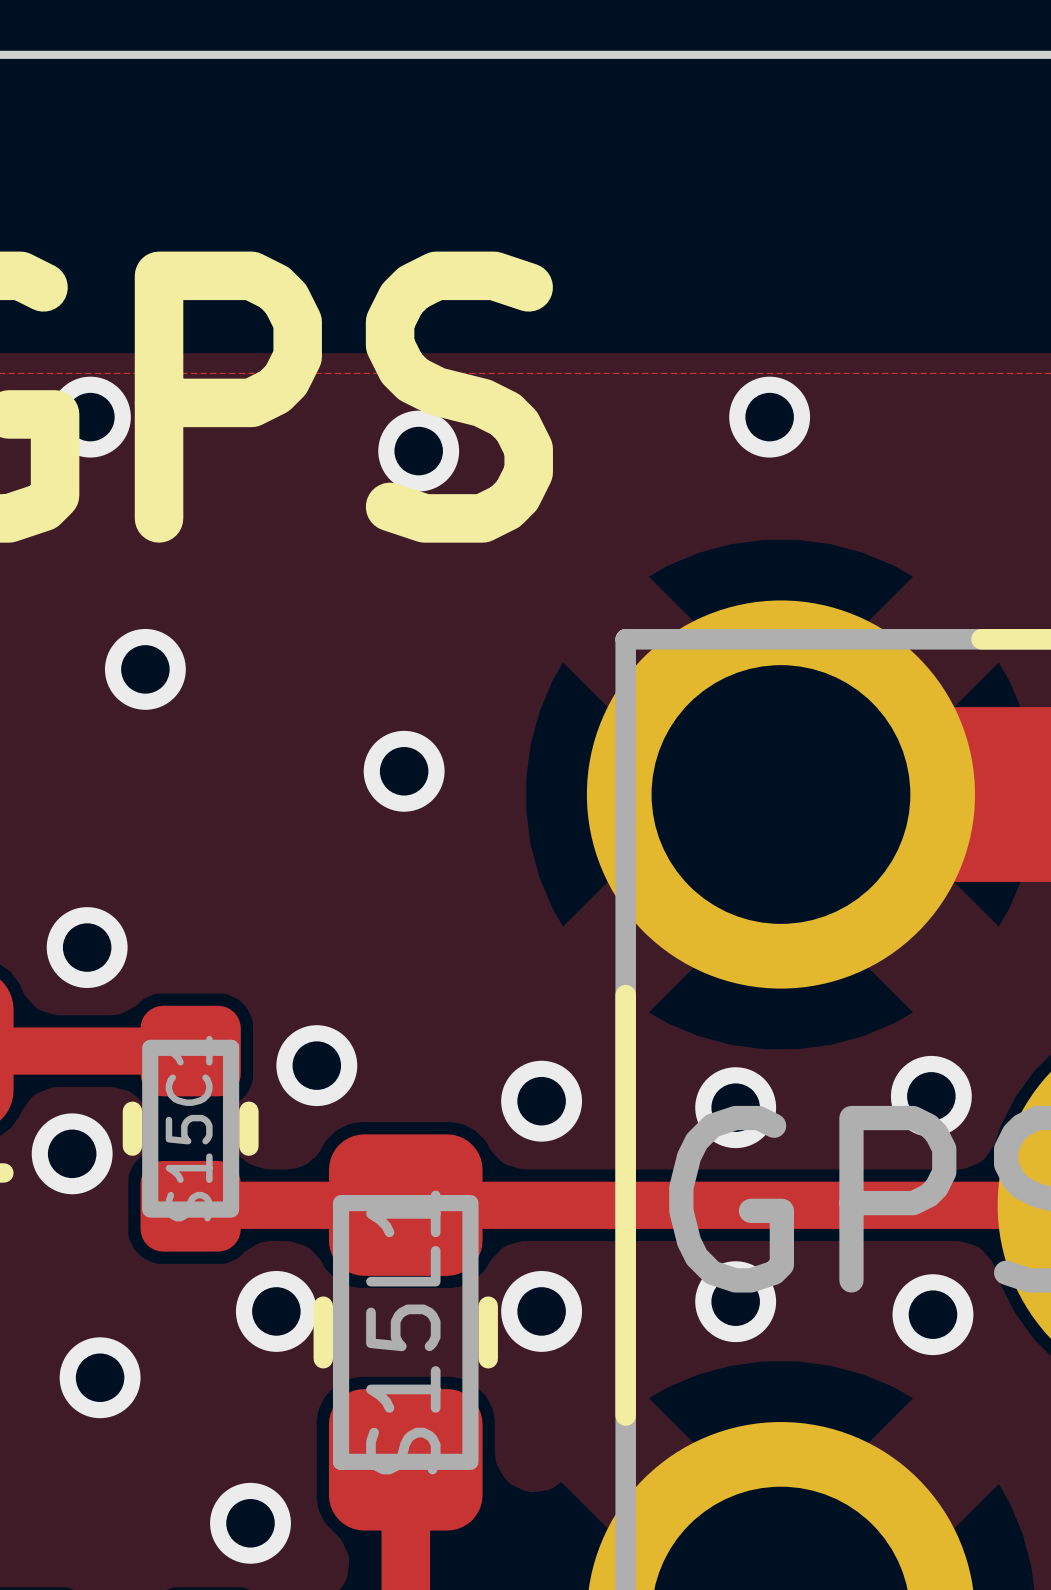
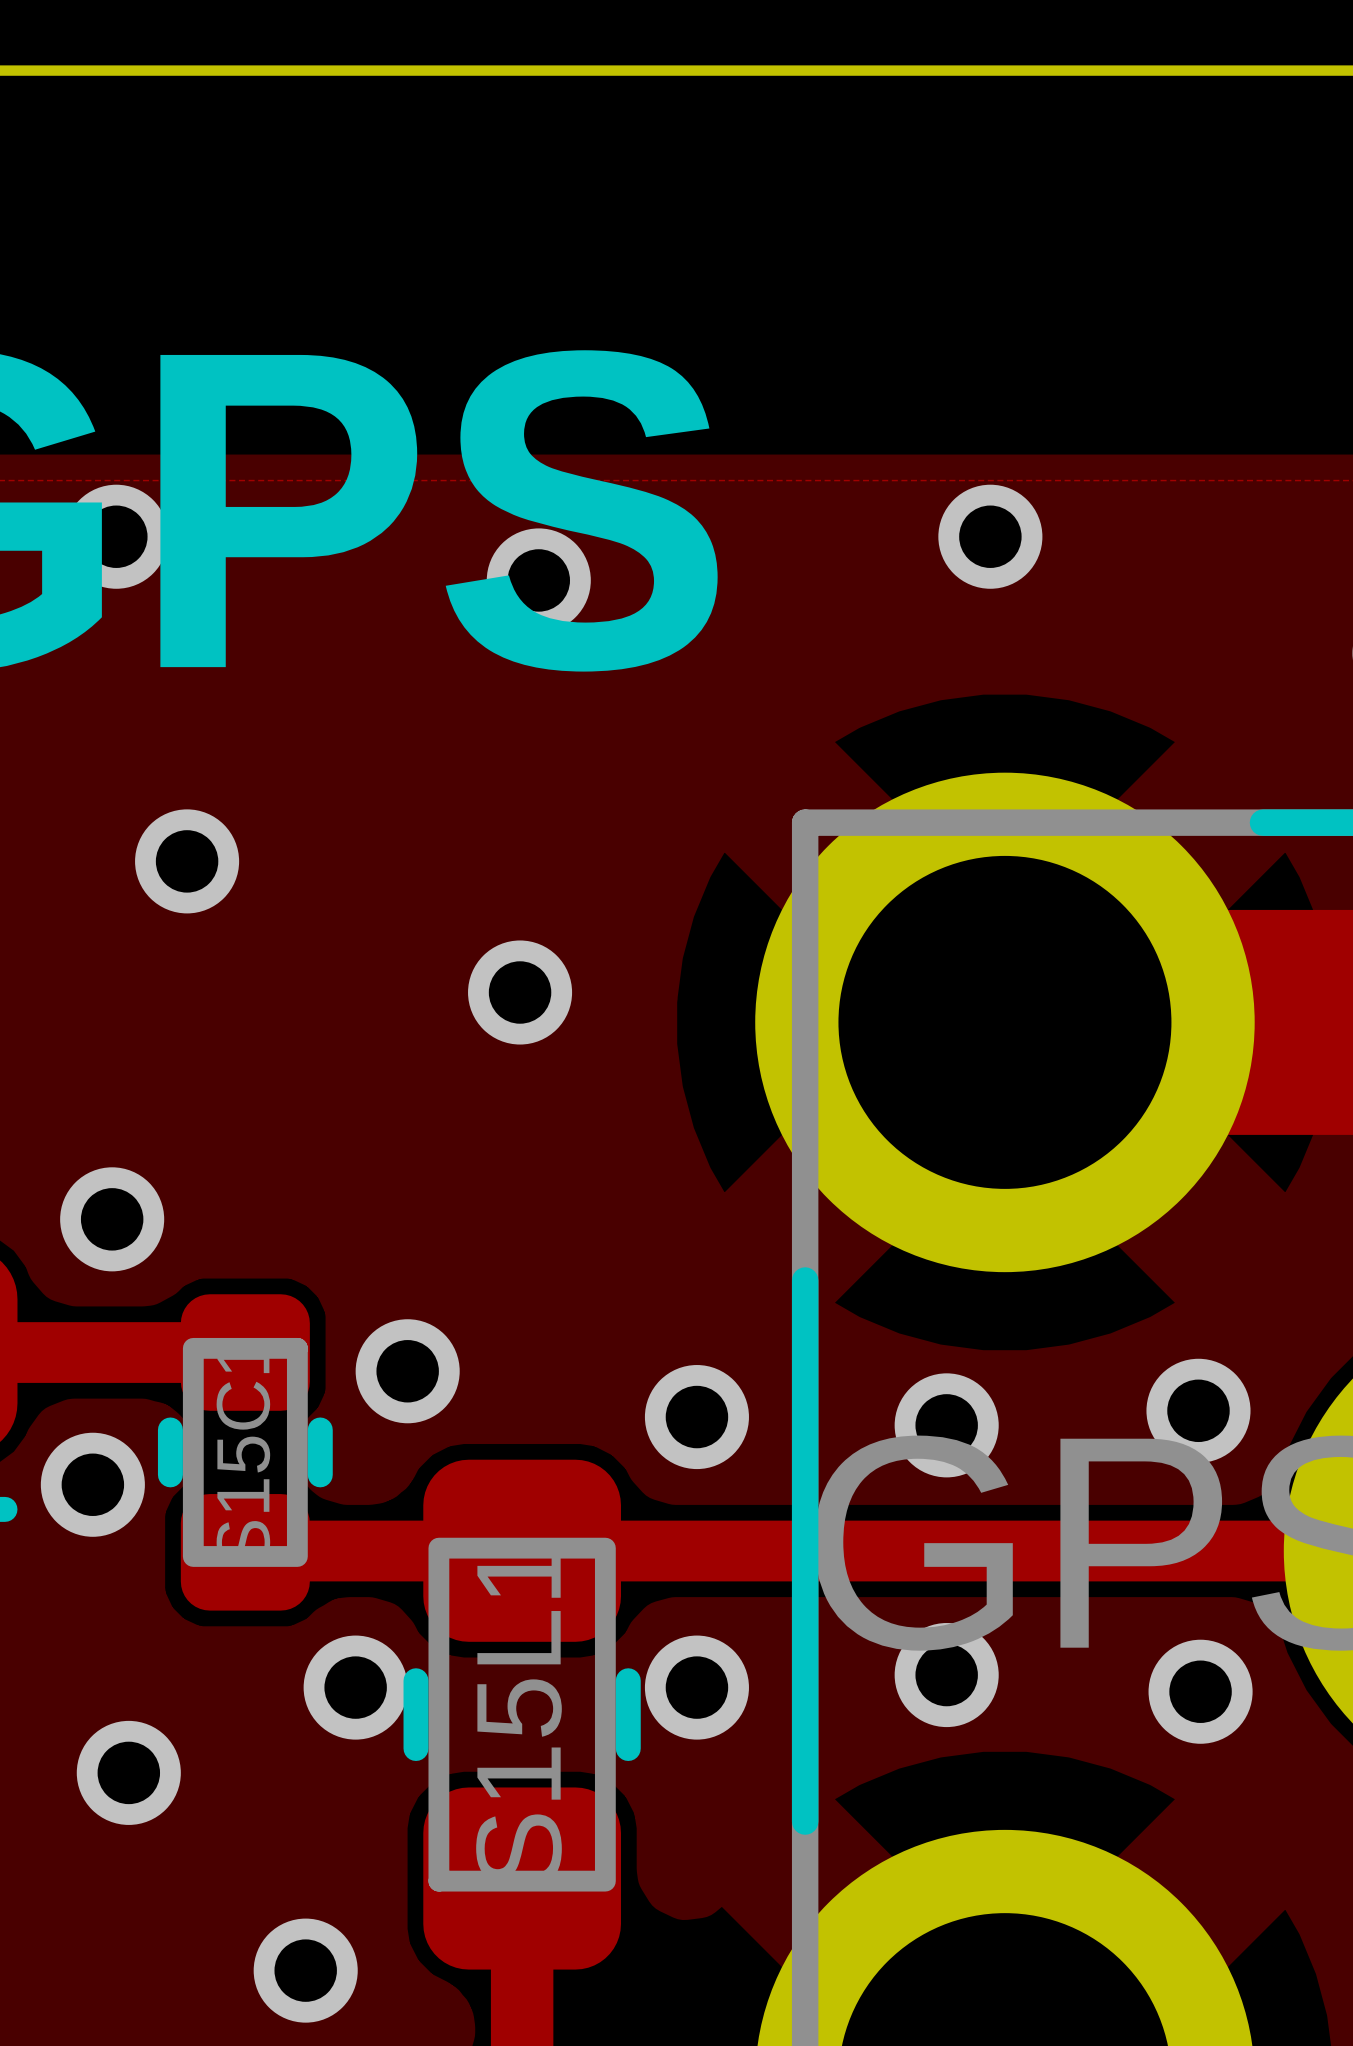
via position: (250, 1523) -> (305, 1970)

